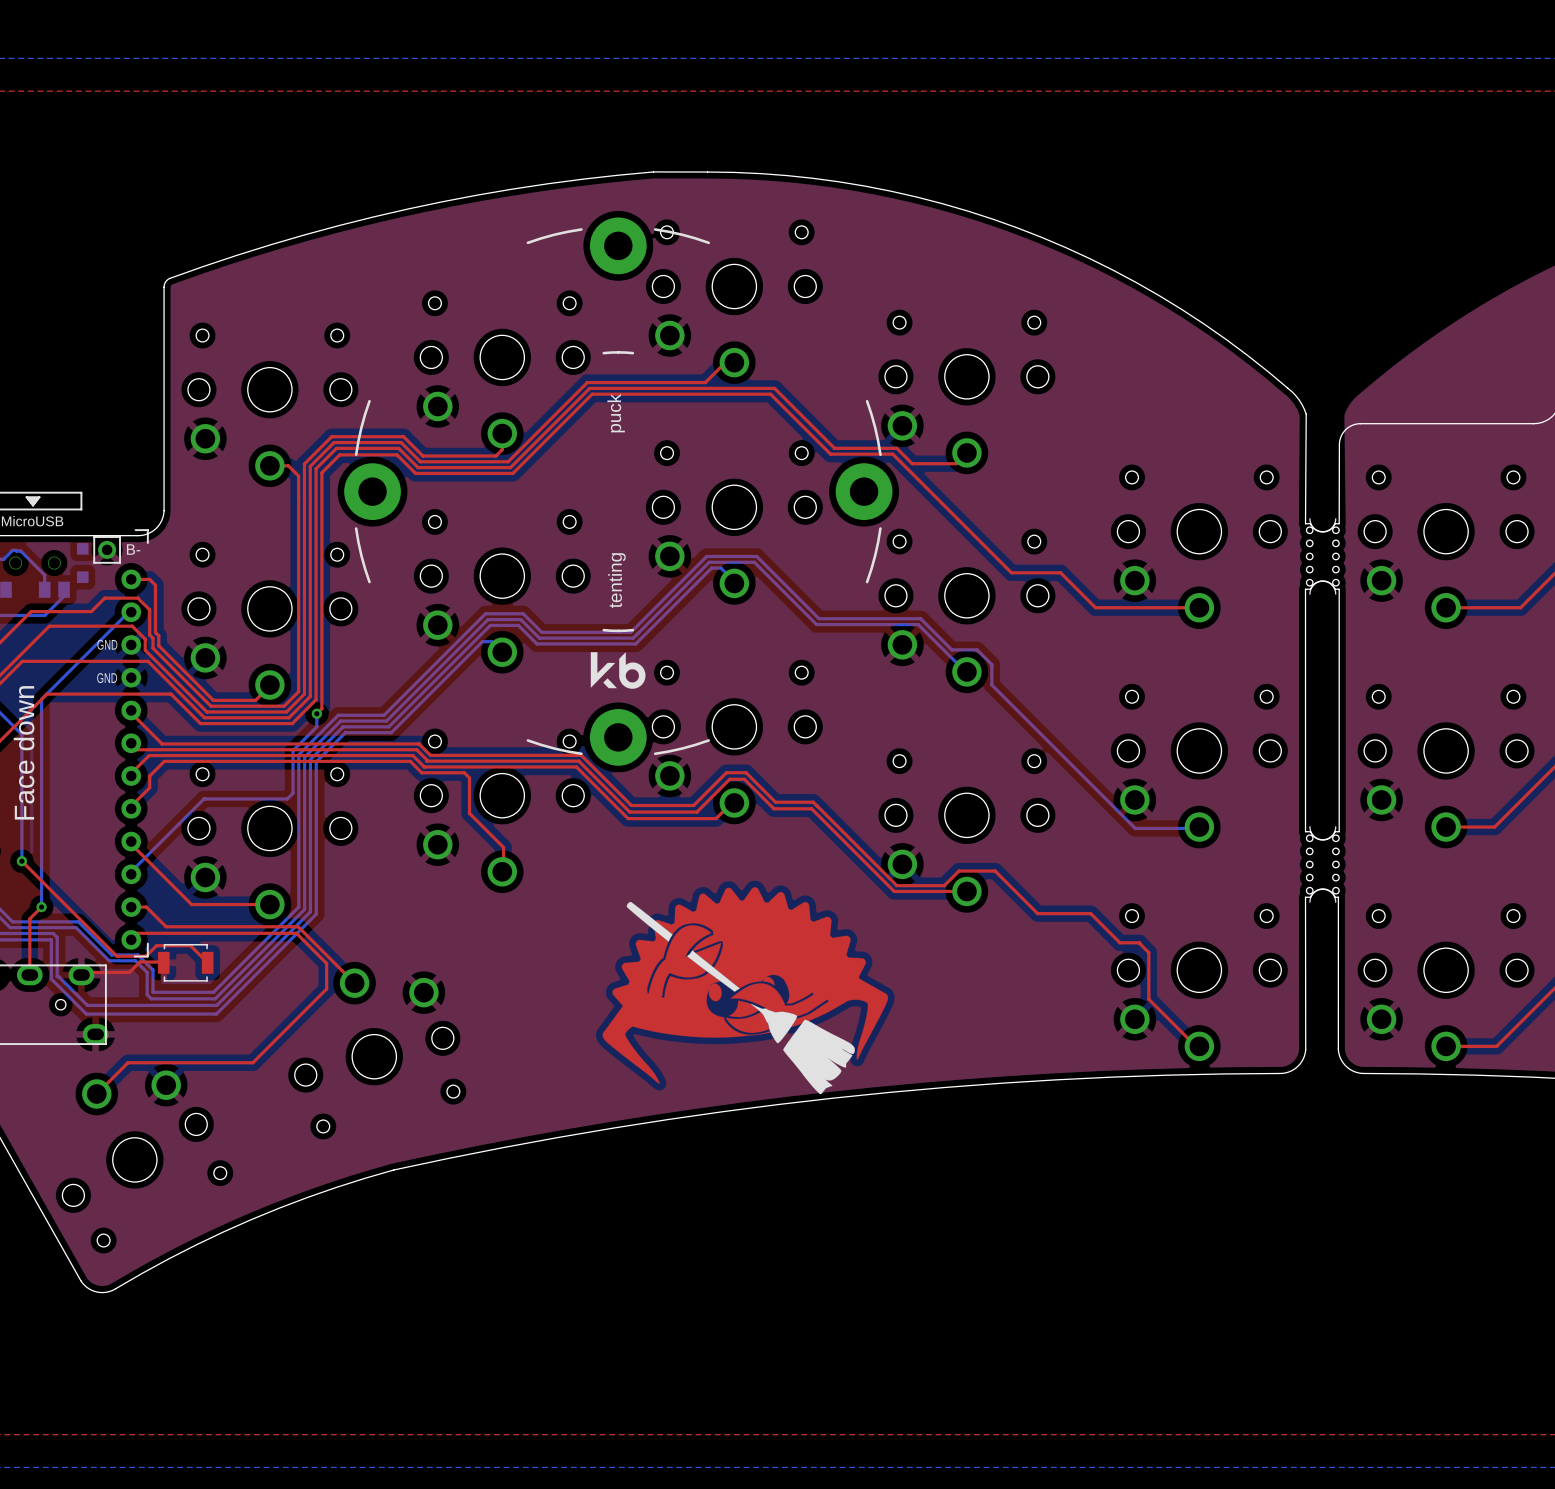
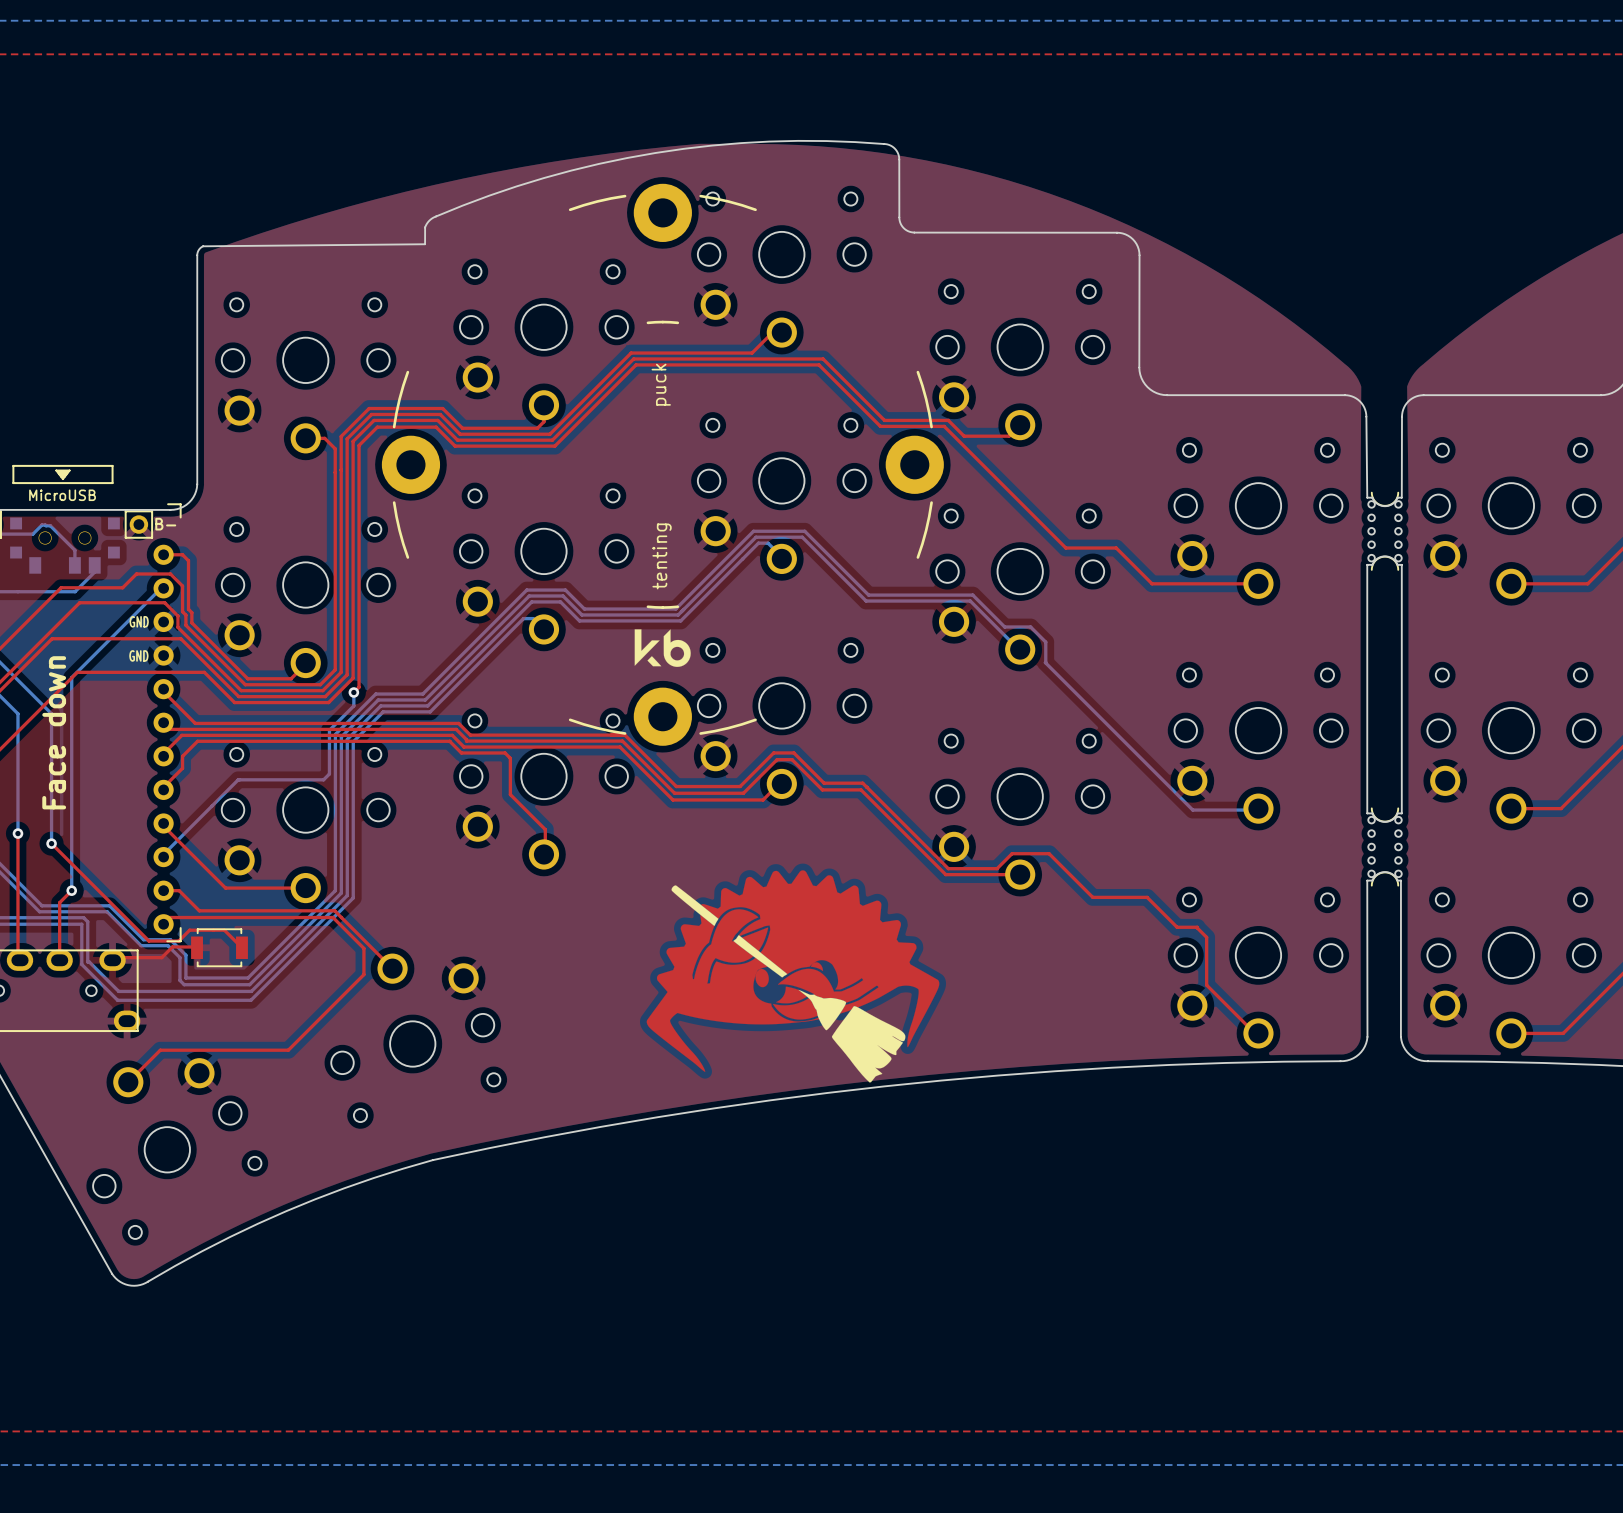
board edge: (169, 278) (270, 244) (373, 216) (477, 195) (582, 179) (653, 171) (733, 172) (812, 178) (890, 191) (941, 203) (992, 218) (1041, 237) (1089, 258) (1136, 282) (1182, 309) (1225, 339) (1267, 371) (1295, 395) (1306, 414) (1305, 523) -> (203, 246) (425, 244) (425, 227) (434, 217) (516, 186) (599, 163) (655, 152) (740, 143) (826, 141) (887, 144) (894, 148) (898, 156) (899, 219) (902, 226) (909, 231) (1116, 232) (1125, 234) (1132, 239) (1137, 246) (1139, 255) (1139, 371) (1143, 381) (1153, 391) (1167, 395) (1344, 395) (1358, 399) (1363, 405) (1366, 414) (1367, 497)

